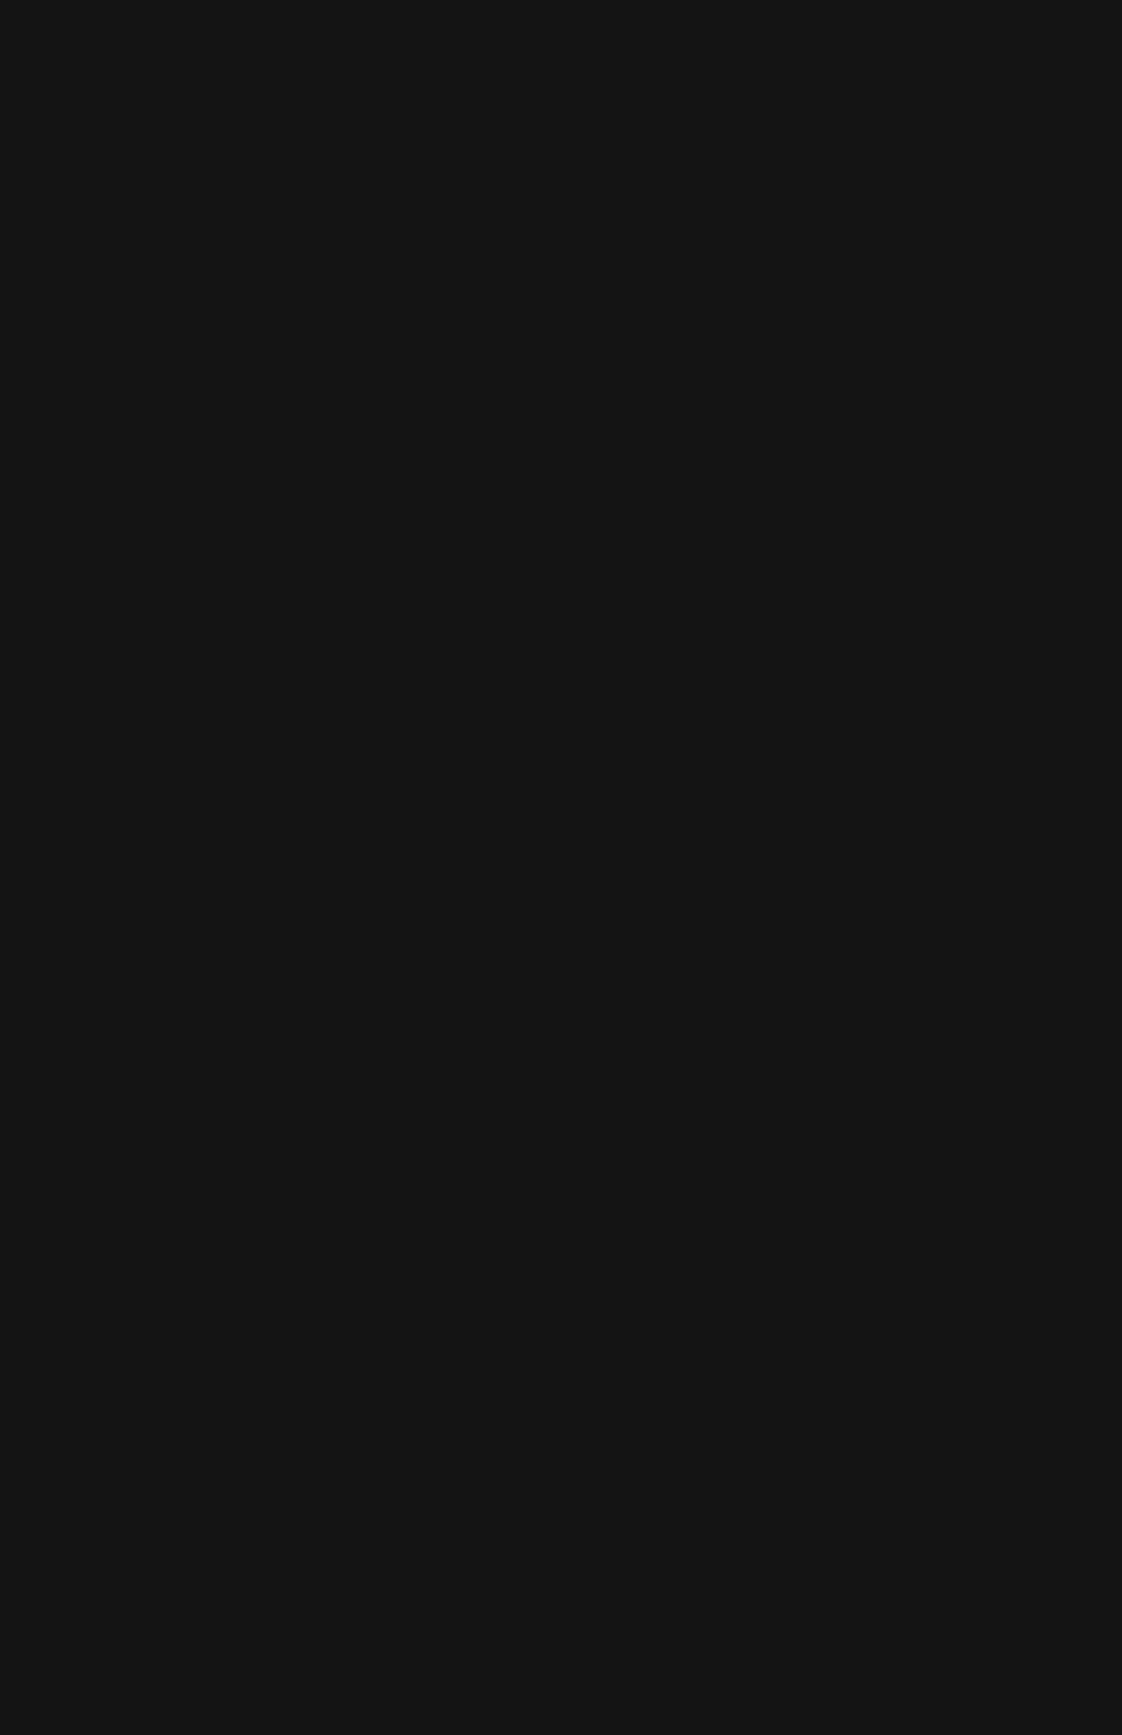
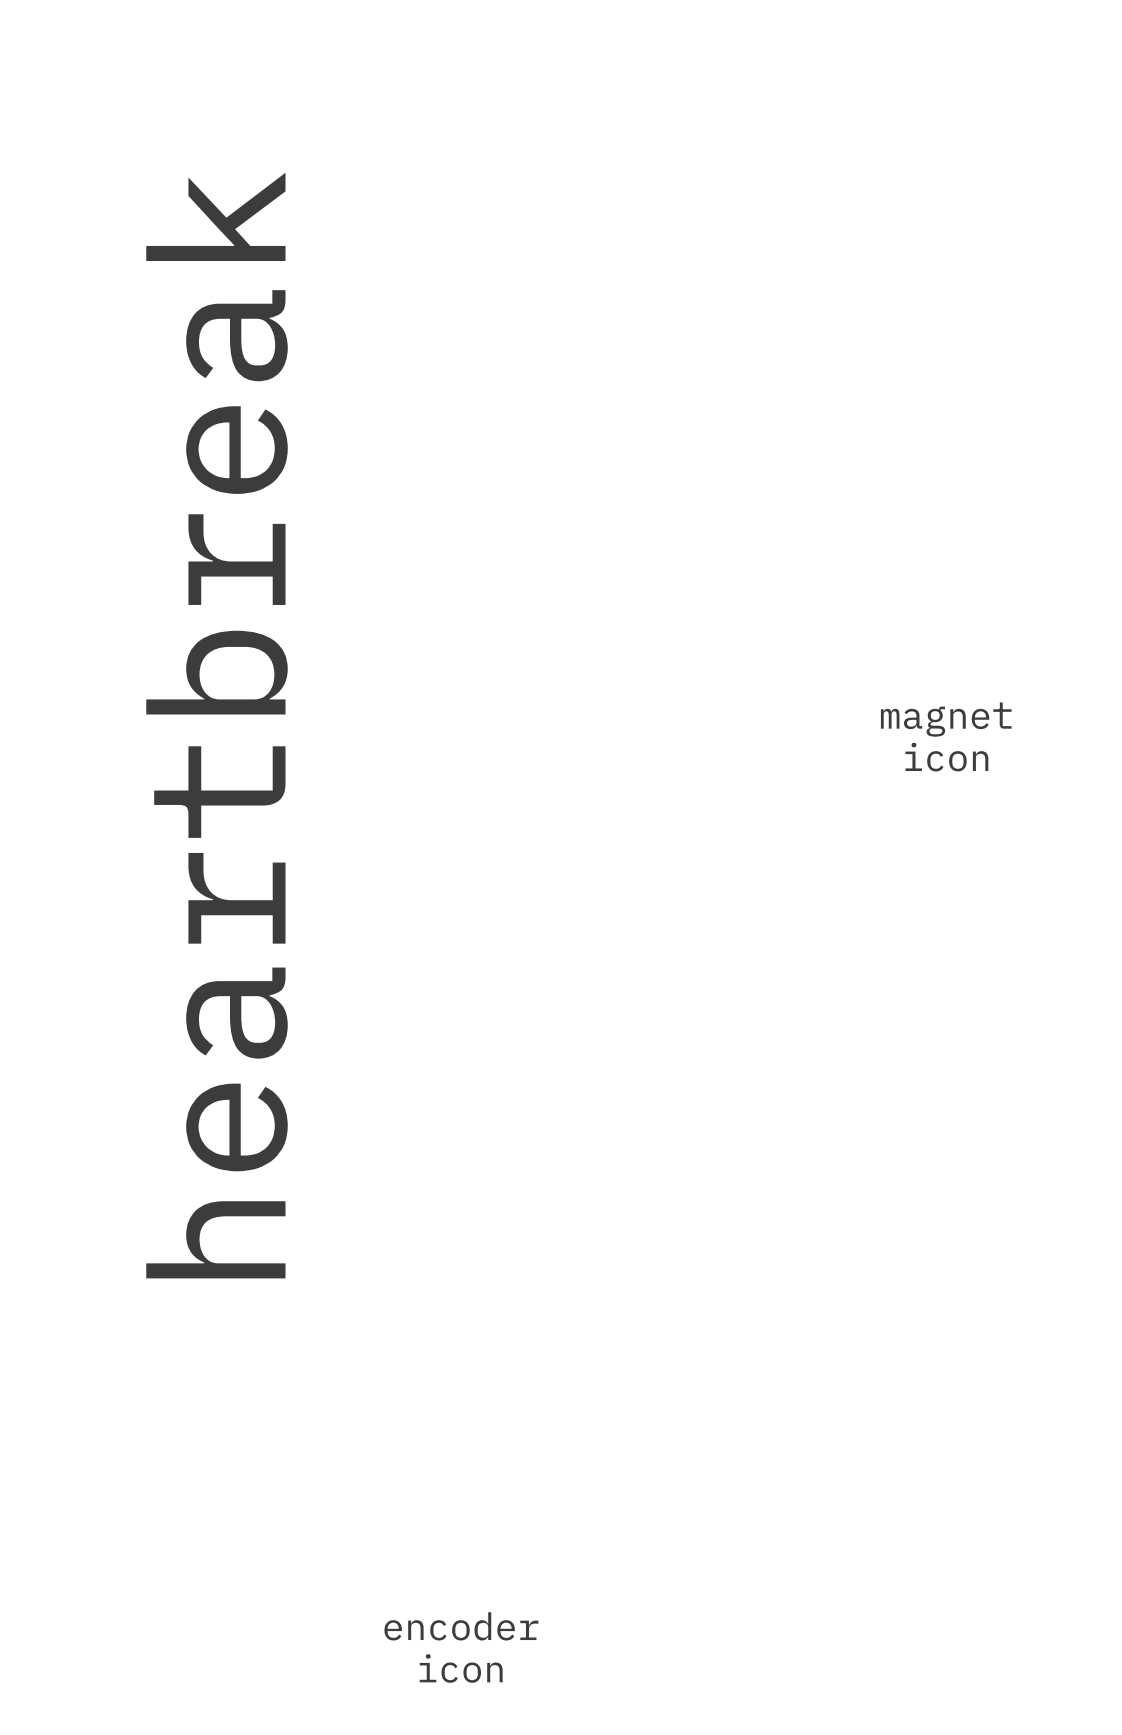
text: none -> magnet (946, 719)
text: none -> heartbreak (217, 725)
text: none -> icon (946, 757)
text: none -> encoder (461, 1626)
text: none -> icon (461, 1668)

